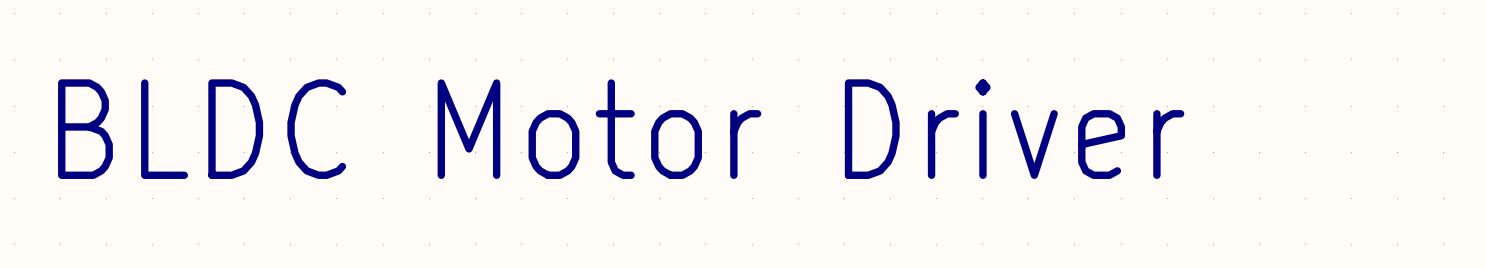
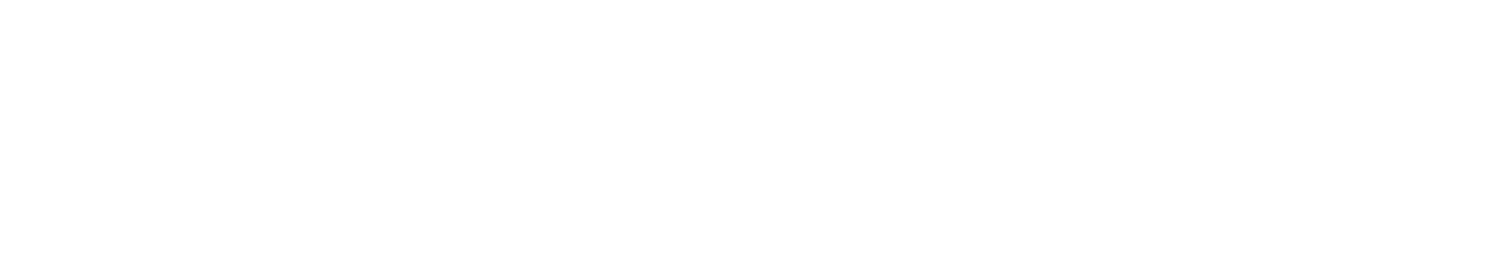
text: BLDC Motor Driver (621, 129) -> none

